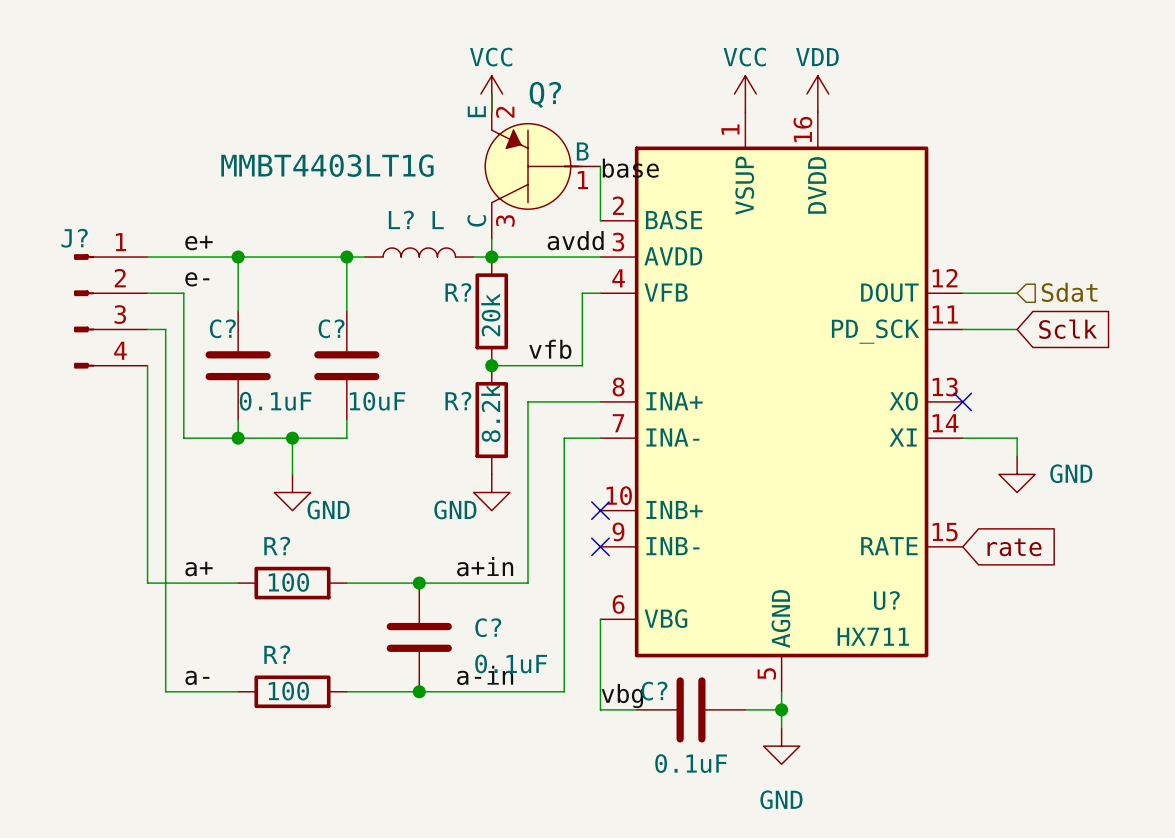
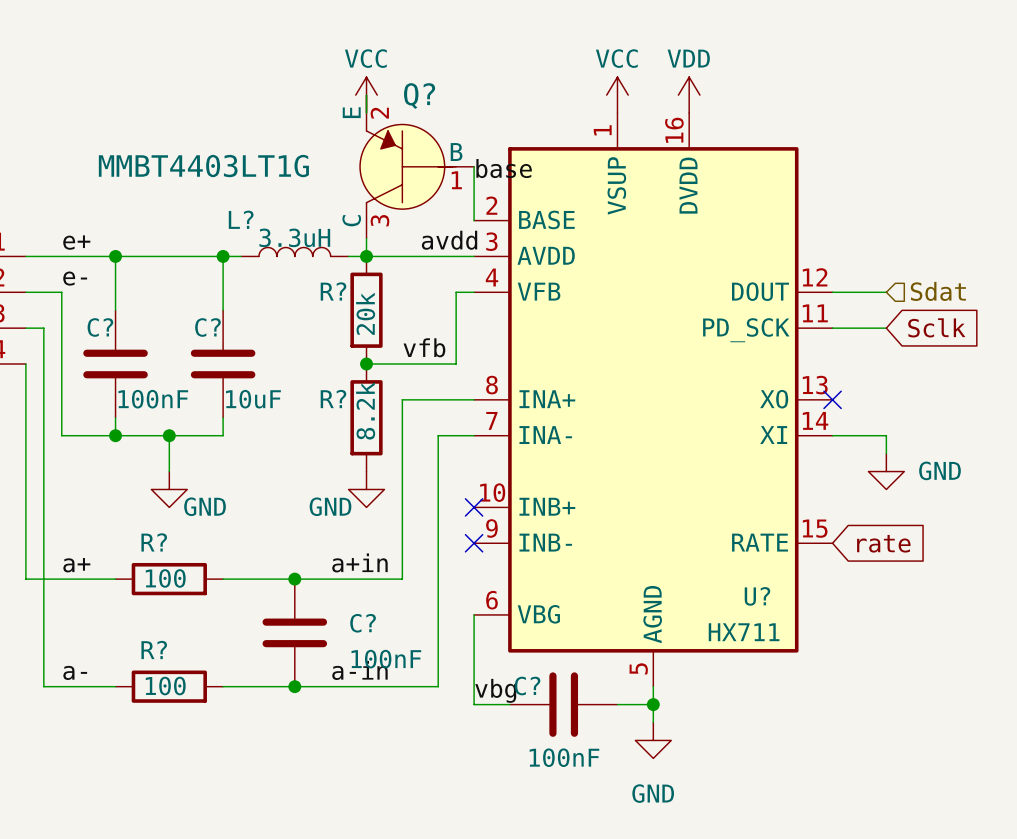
L? name position: L? (401, 219) -> L? (241, 219)
L? value: L (438, 220) -> 3.3uH (294, 237)
C? value: 0.1uF (275, 401) -> 100nF (153, 399)
C? value: 0.1uF (511, 663) -> 100nF (386, 659)
C? value: 0.1uF (691, 763) -> 100nF (564, 757)

